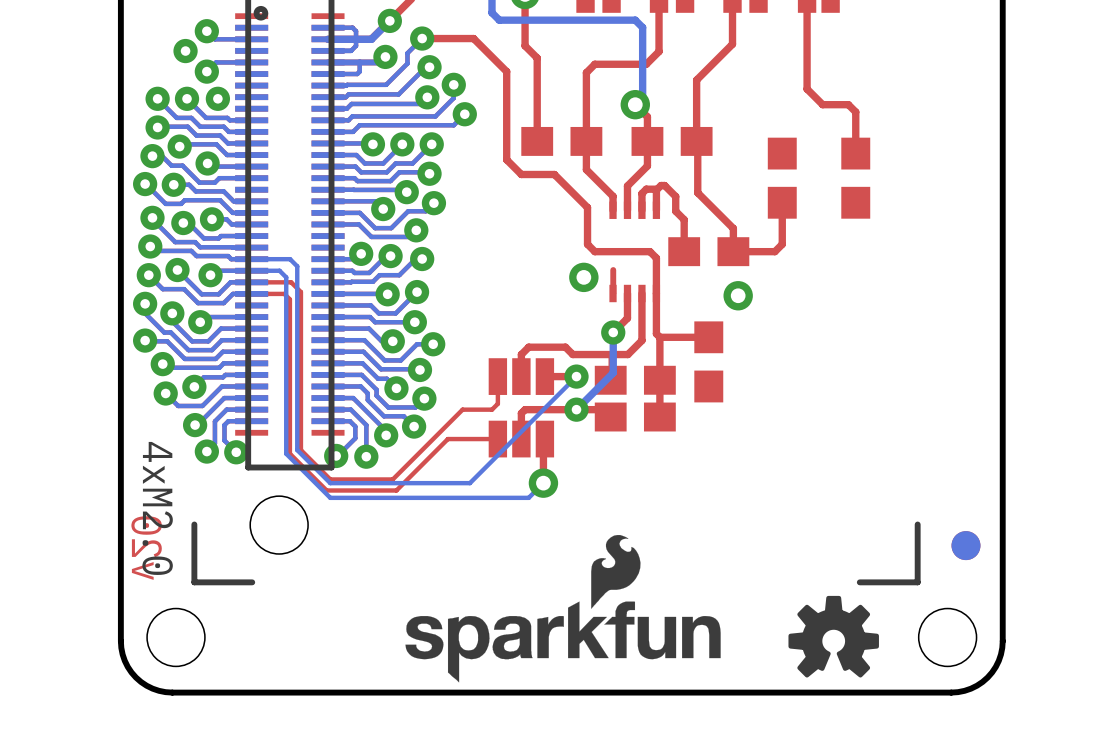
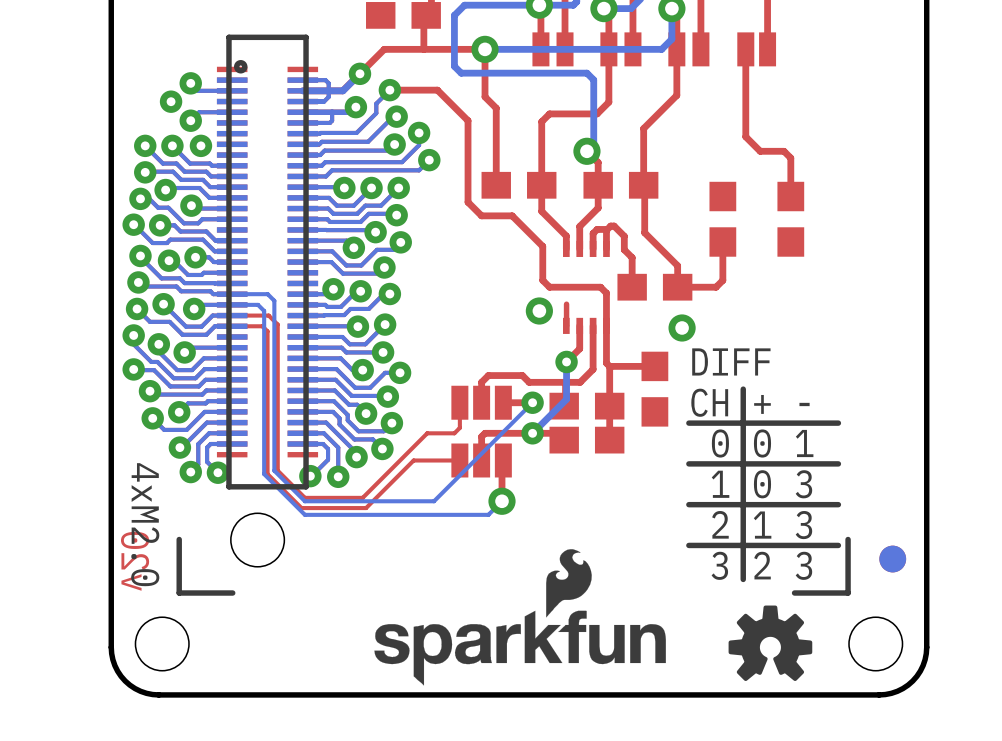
text: none -> DIFF (731, 361)
line: none -> (743, 389) (743, 579)
text: none -> CH + - (750, 402)
line: none -> (838, 423) (688, 423)
text: none -> 0 0 1 (762, 443)
line: none -> (838, 463) (688, 463)
text: none -> 1 0 3 (761, 484)
line: none -> (838, 504) (688, 504)
text: none -> 2 1 3 (762, 525)
line: none -> (838, 545) (688, 545)
text: none -> 3 2 3 (761, 565)

